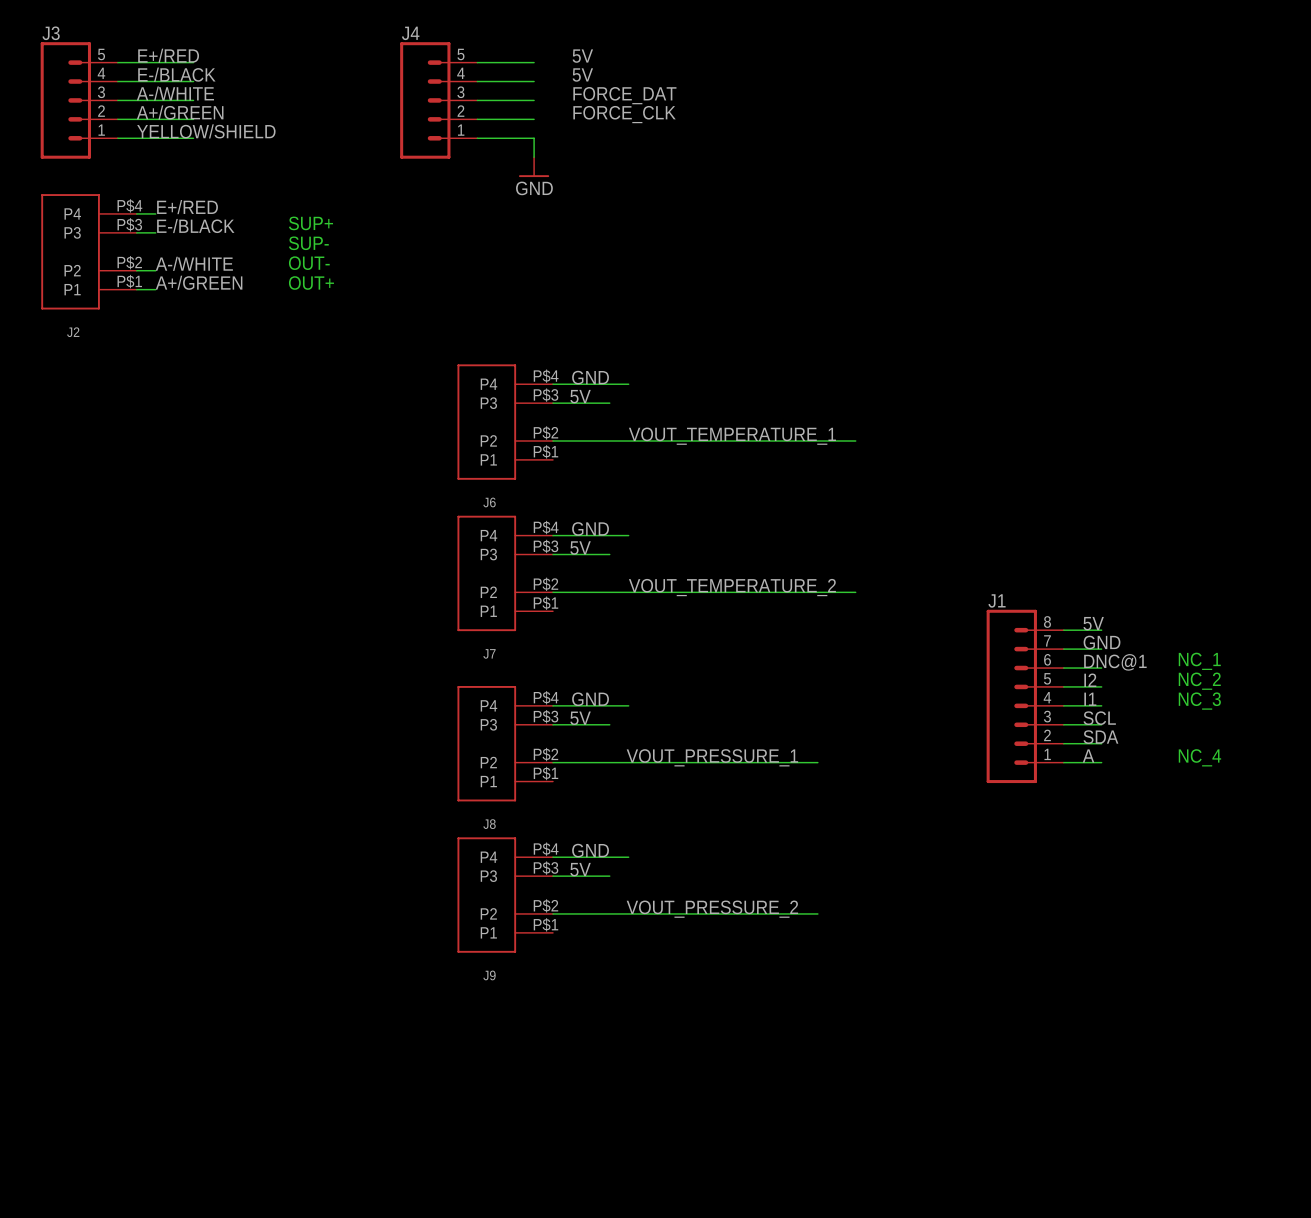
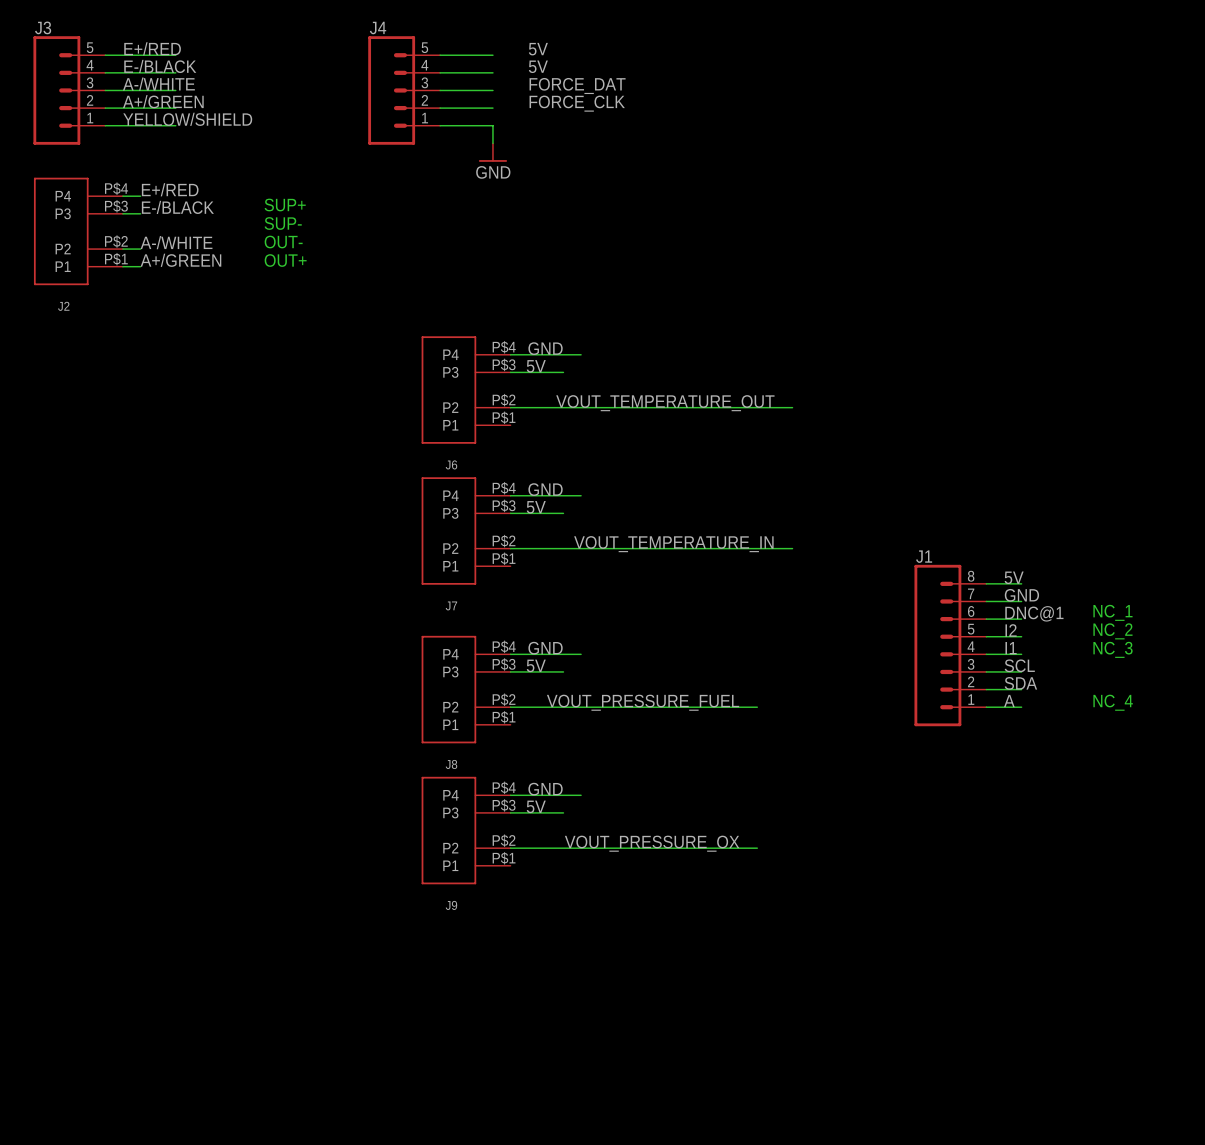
label: VOUT_TEMPERATURE_1 (732, 436) -> VOUT_TEMPERATURE_OUT (665, 403)
label: VOUT_TEMPERATURE_2 (732, 587) -> VOUT_TEMPERATURE_IN (673, 544)
label: VOUT_PRESSURE_1 (712, 757) -> VOUT_PRESSURE_FUEL (643, 702)
label: VOUT_PRESSURE_2 (712, 909) -> VOUT_PRESSURE_OX (652, 843)

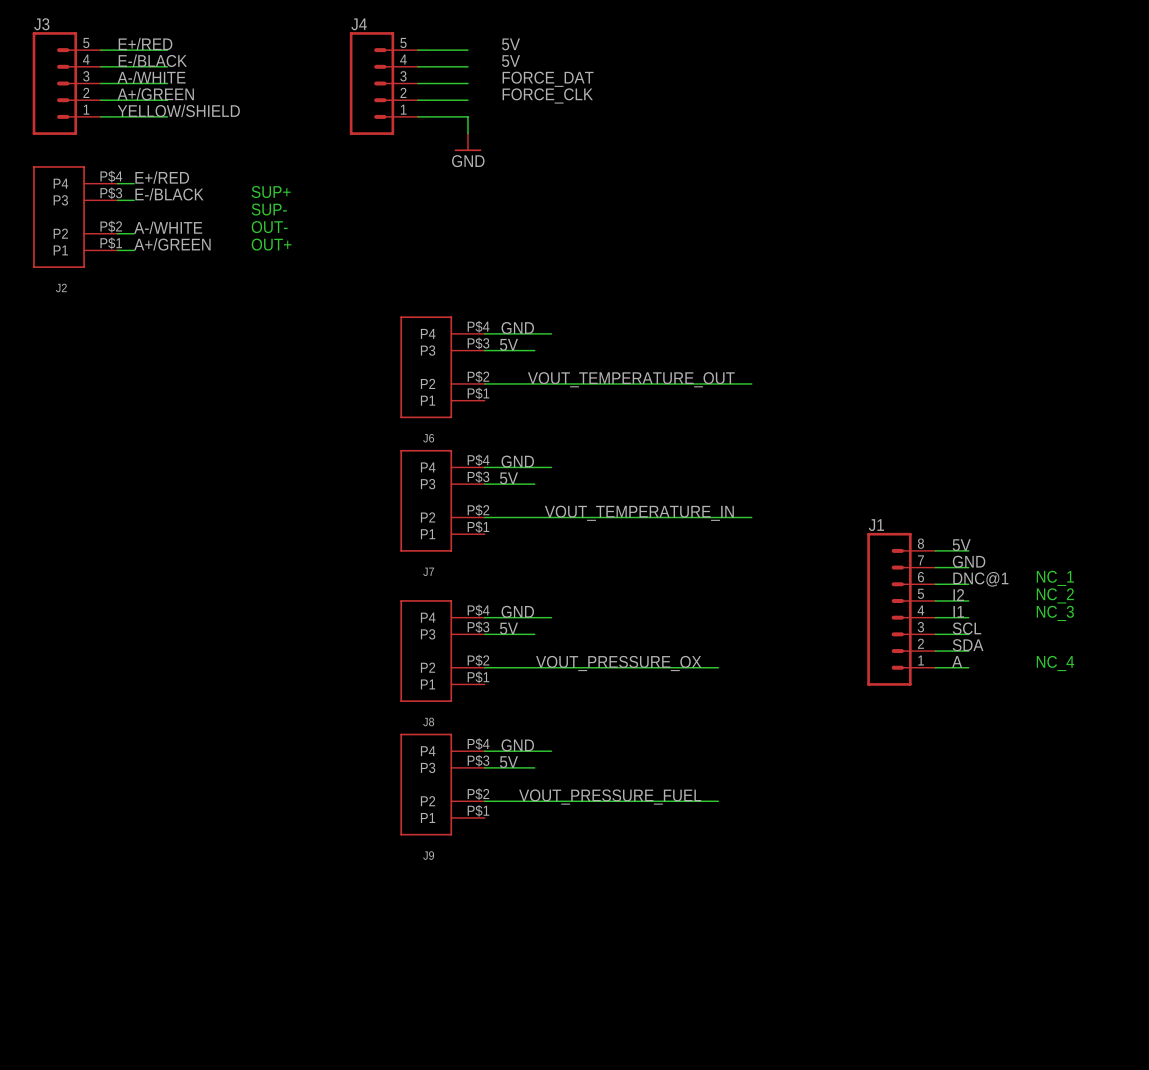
label: VOUT_PRESSURE_FUEL (643, 702) -> VOUT_PRESSURE_OX (618, 663)
label: VOUT_PRESSURE_OX (652, 843) -> VOUT_PRESSURE_FUEL (610, 797)

